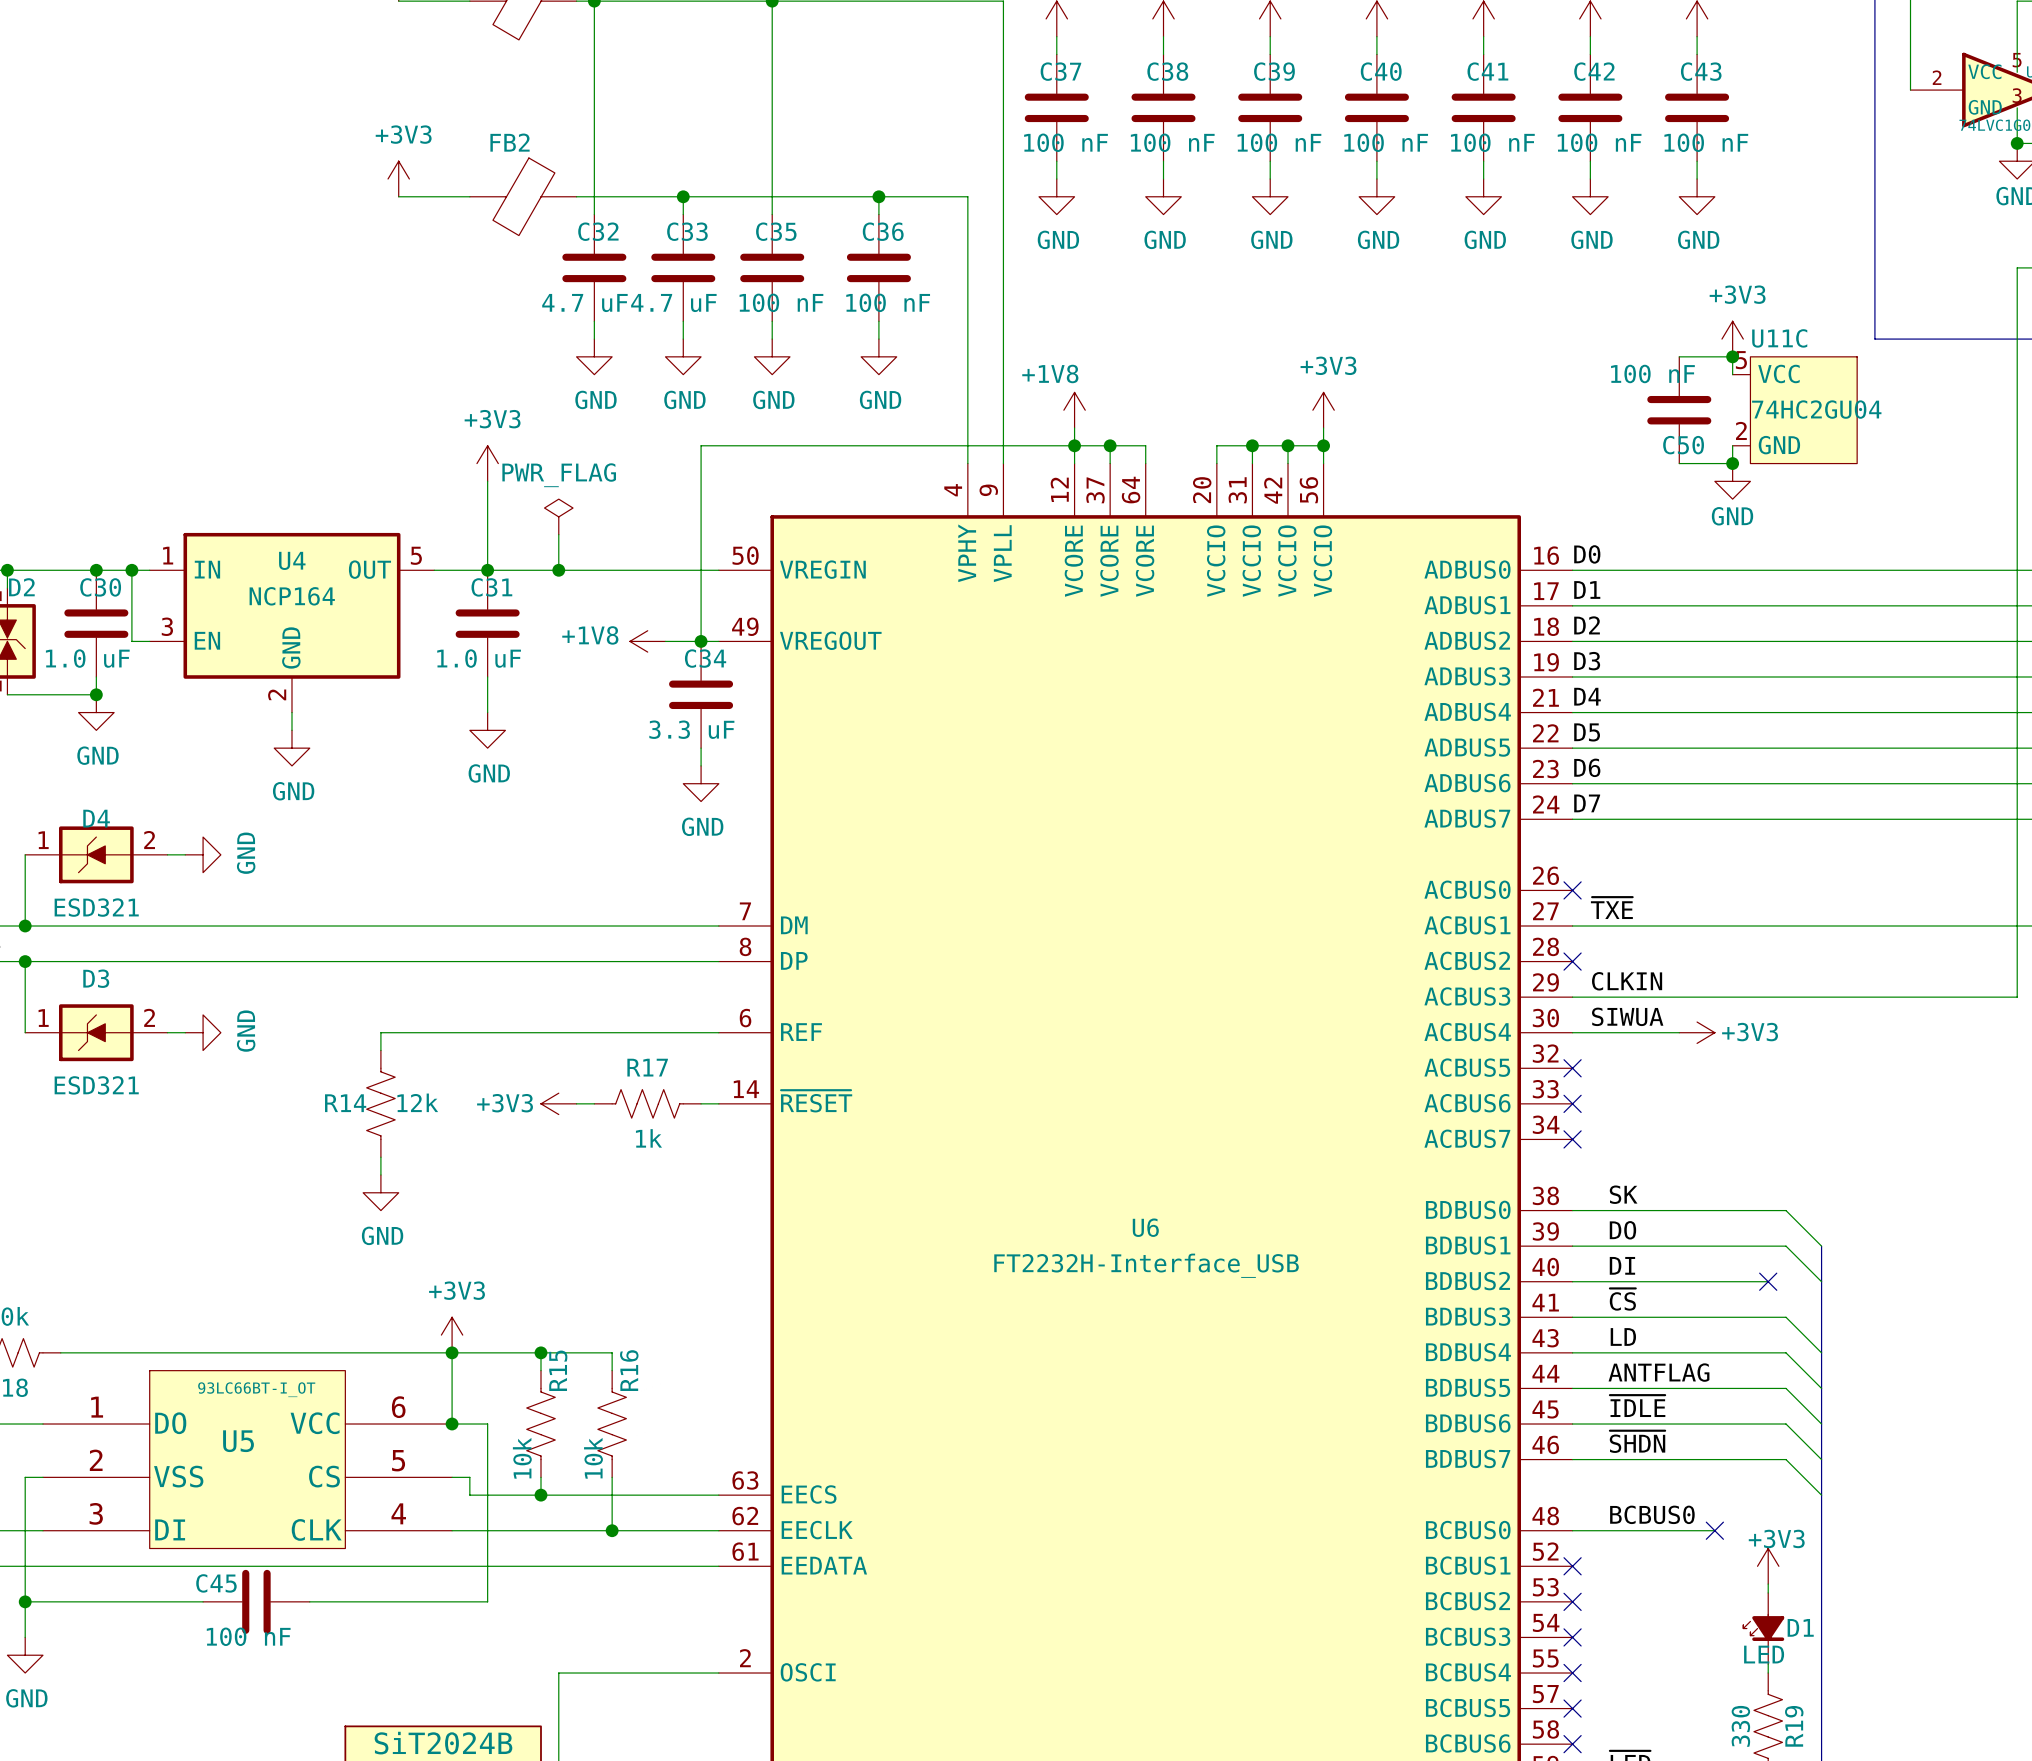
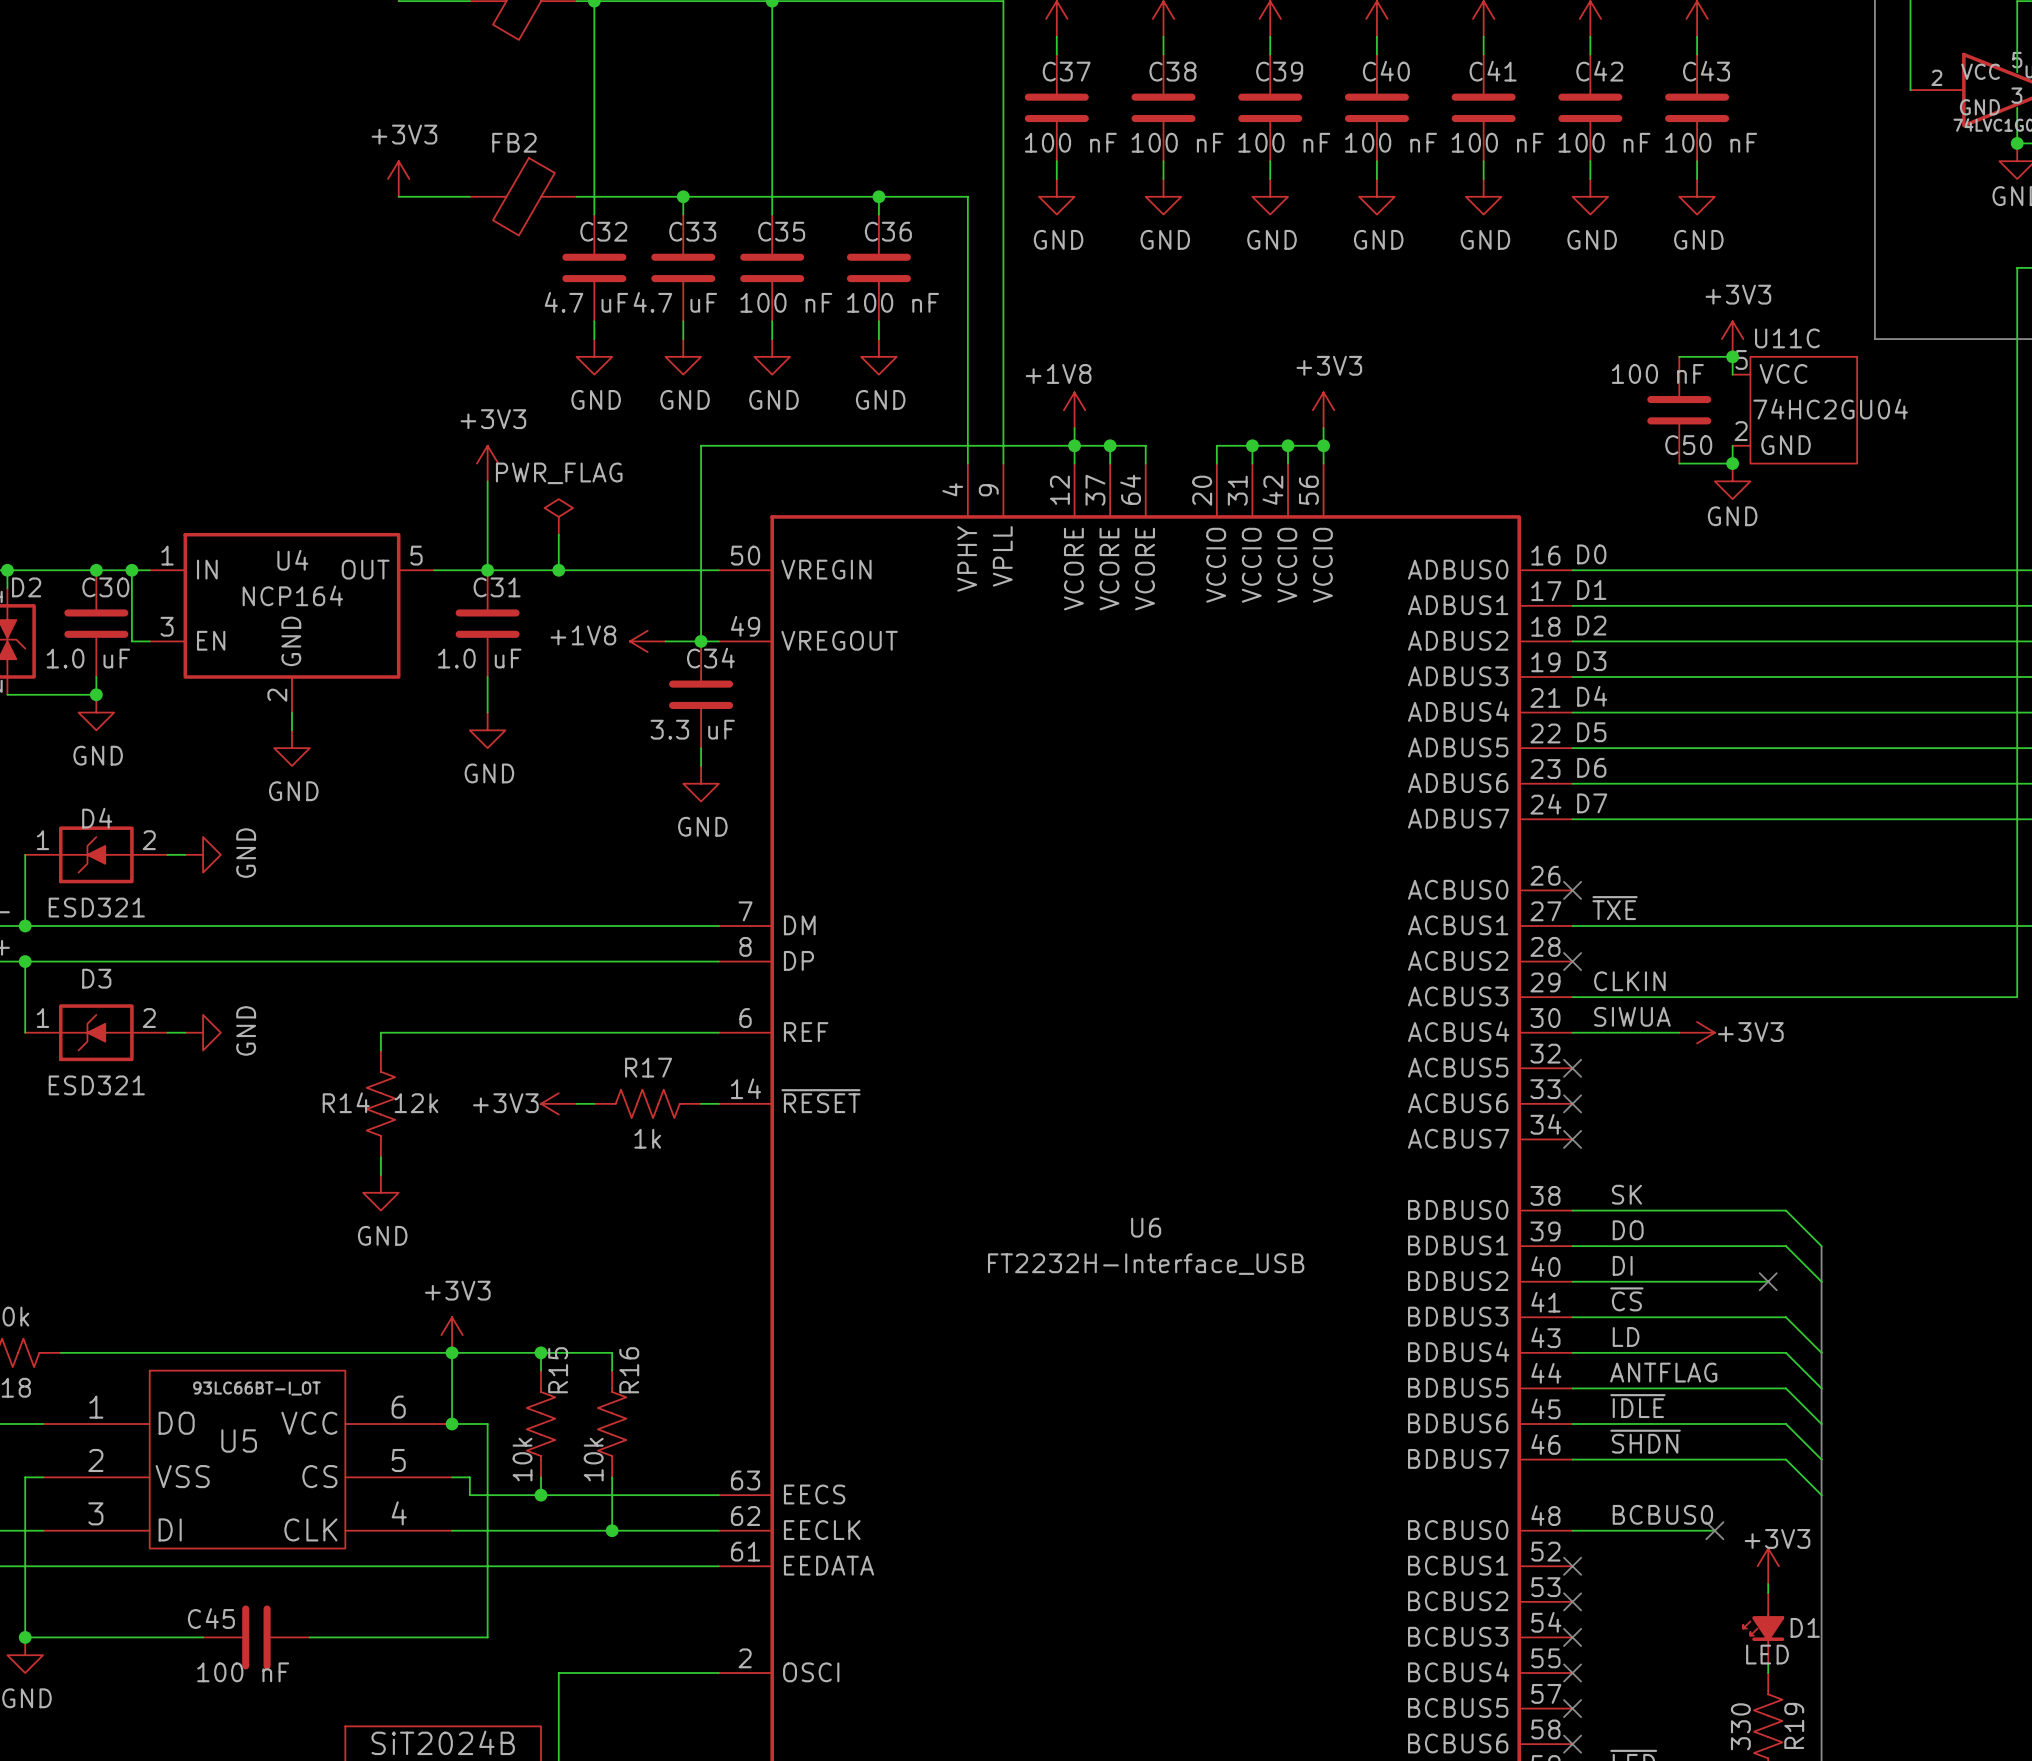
wire: (25, 1601) (203, 1601) -> (25, 1637) (203, 1637)
junction position: (25, 1601) -> (25, 1637)
C45 position: (256, 1601) -> (256, 1637)
wire: (309, 1601) (487, 1601) -> (309, 1637) (487, 1637) (487, 1601)

